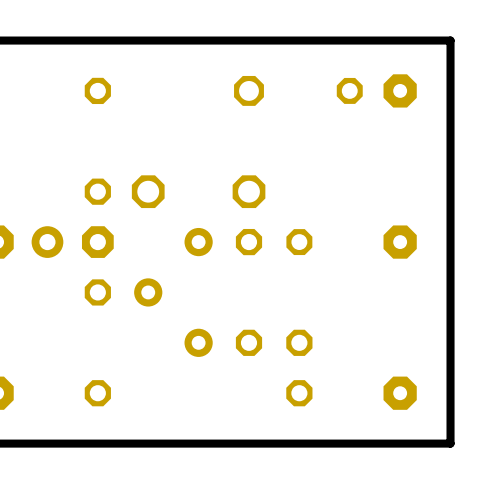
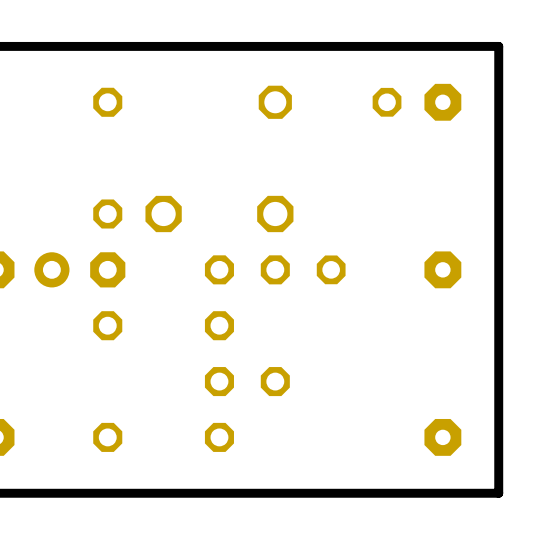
part: none -> (219, 297)
part: (173, 292) -> none
part: none -> (219, 409)
part: (299, 368) -> none

